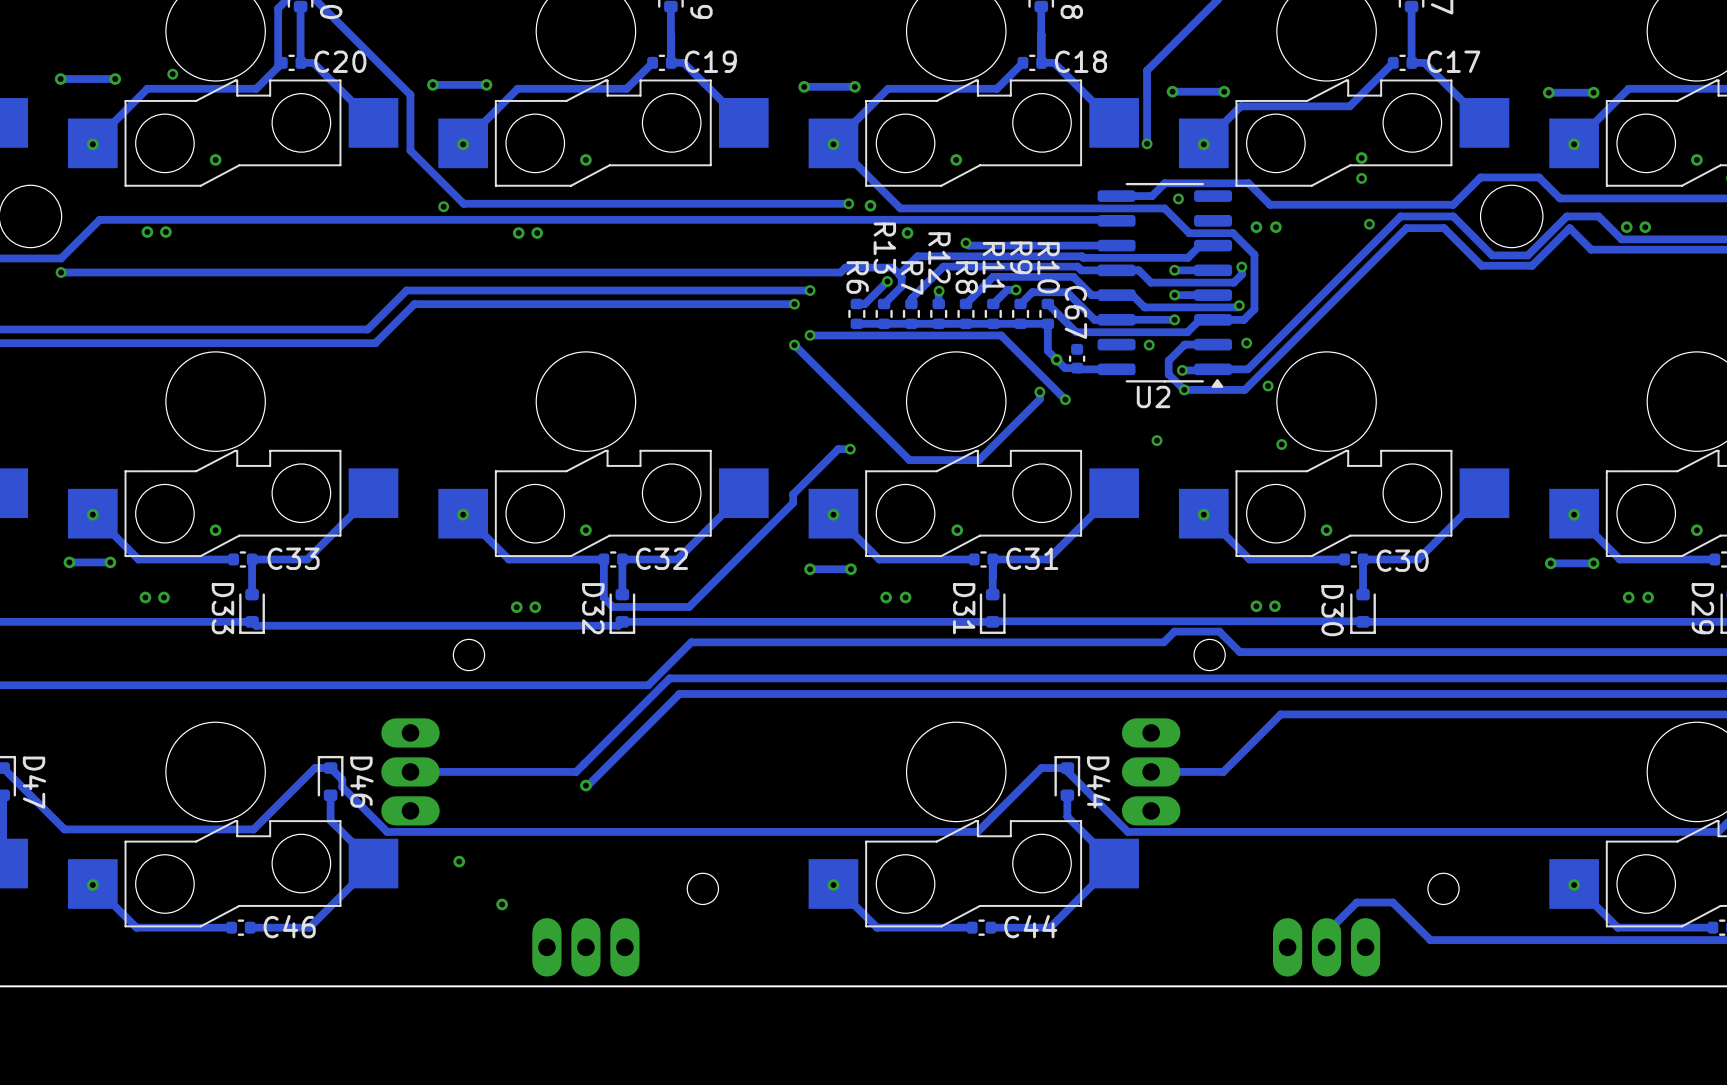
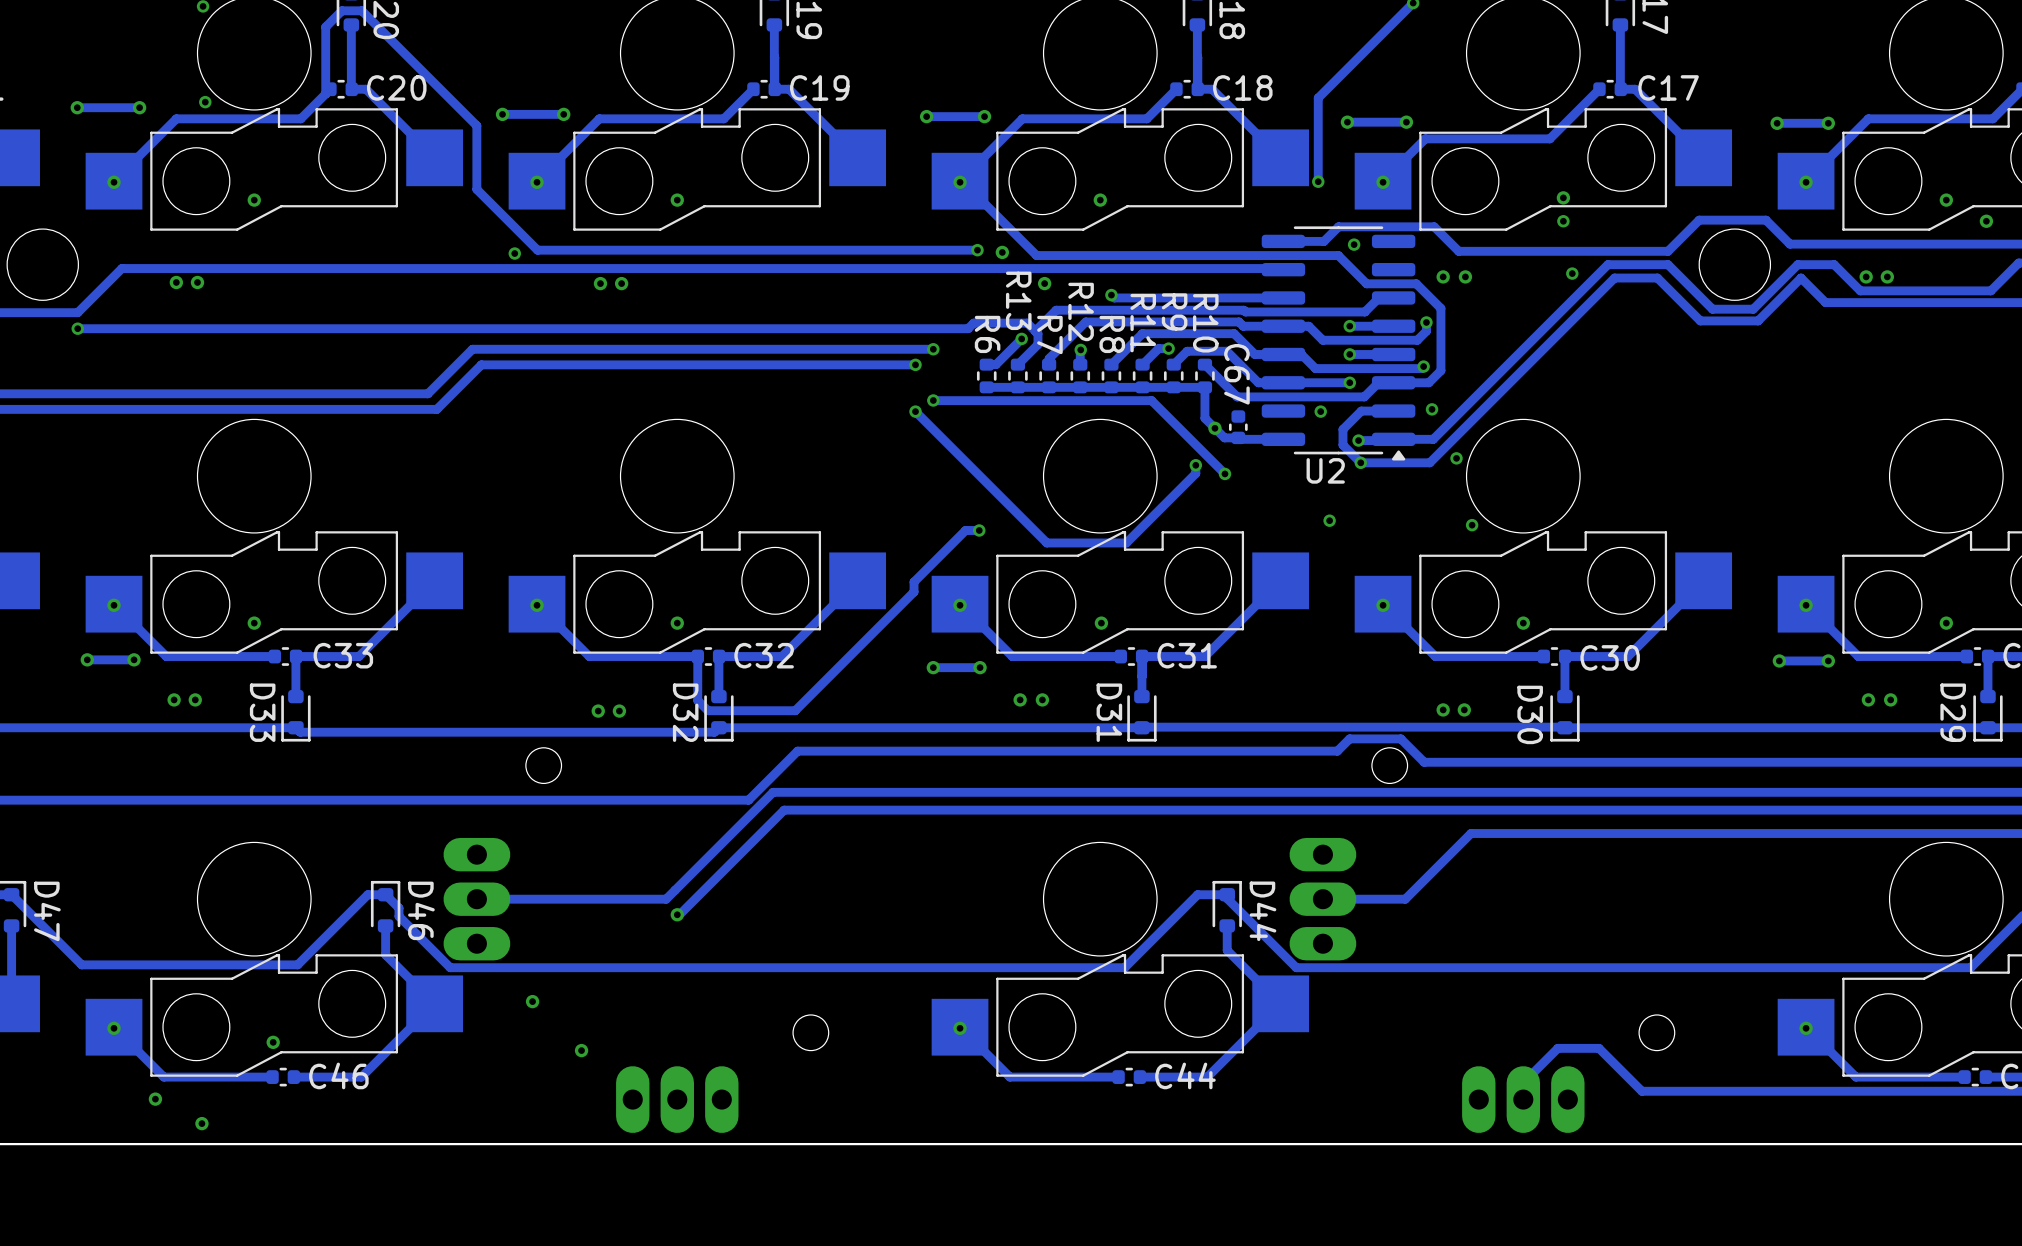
via: none -> (273, 1042)
via: none -> (155, 1099)
via: none -> (201, 1123)

